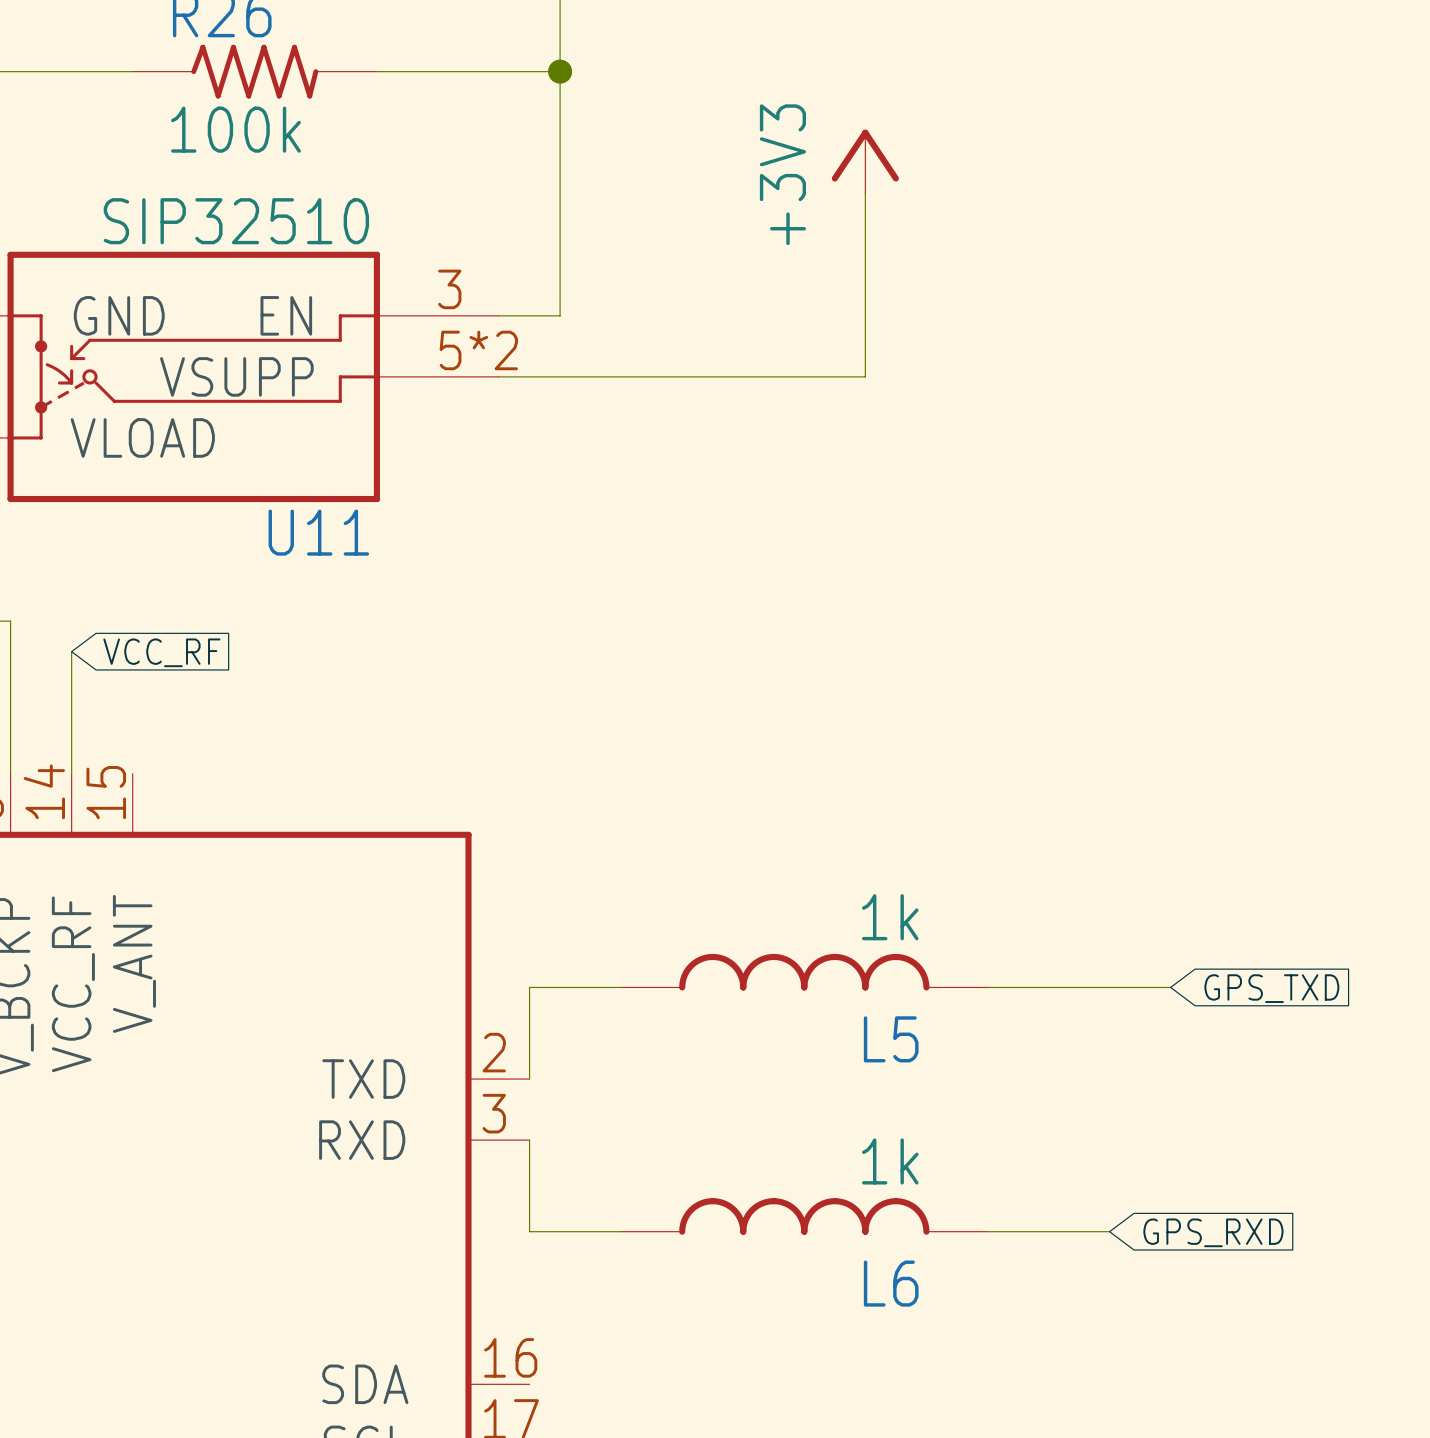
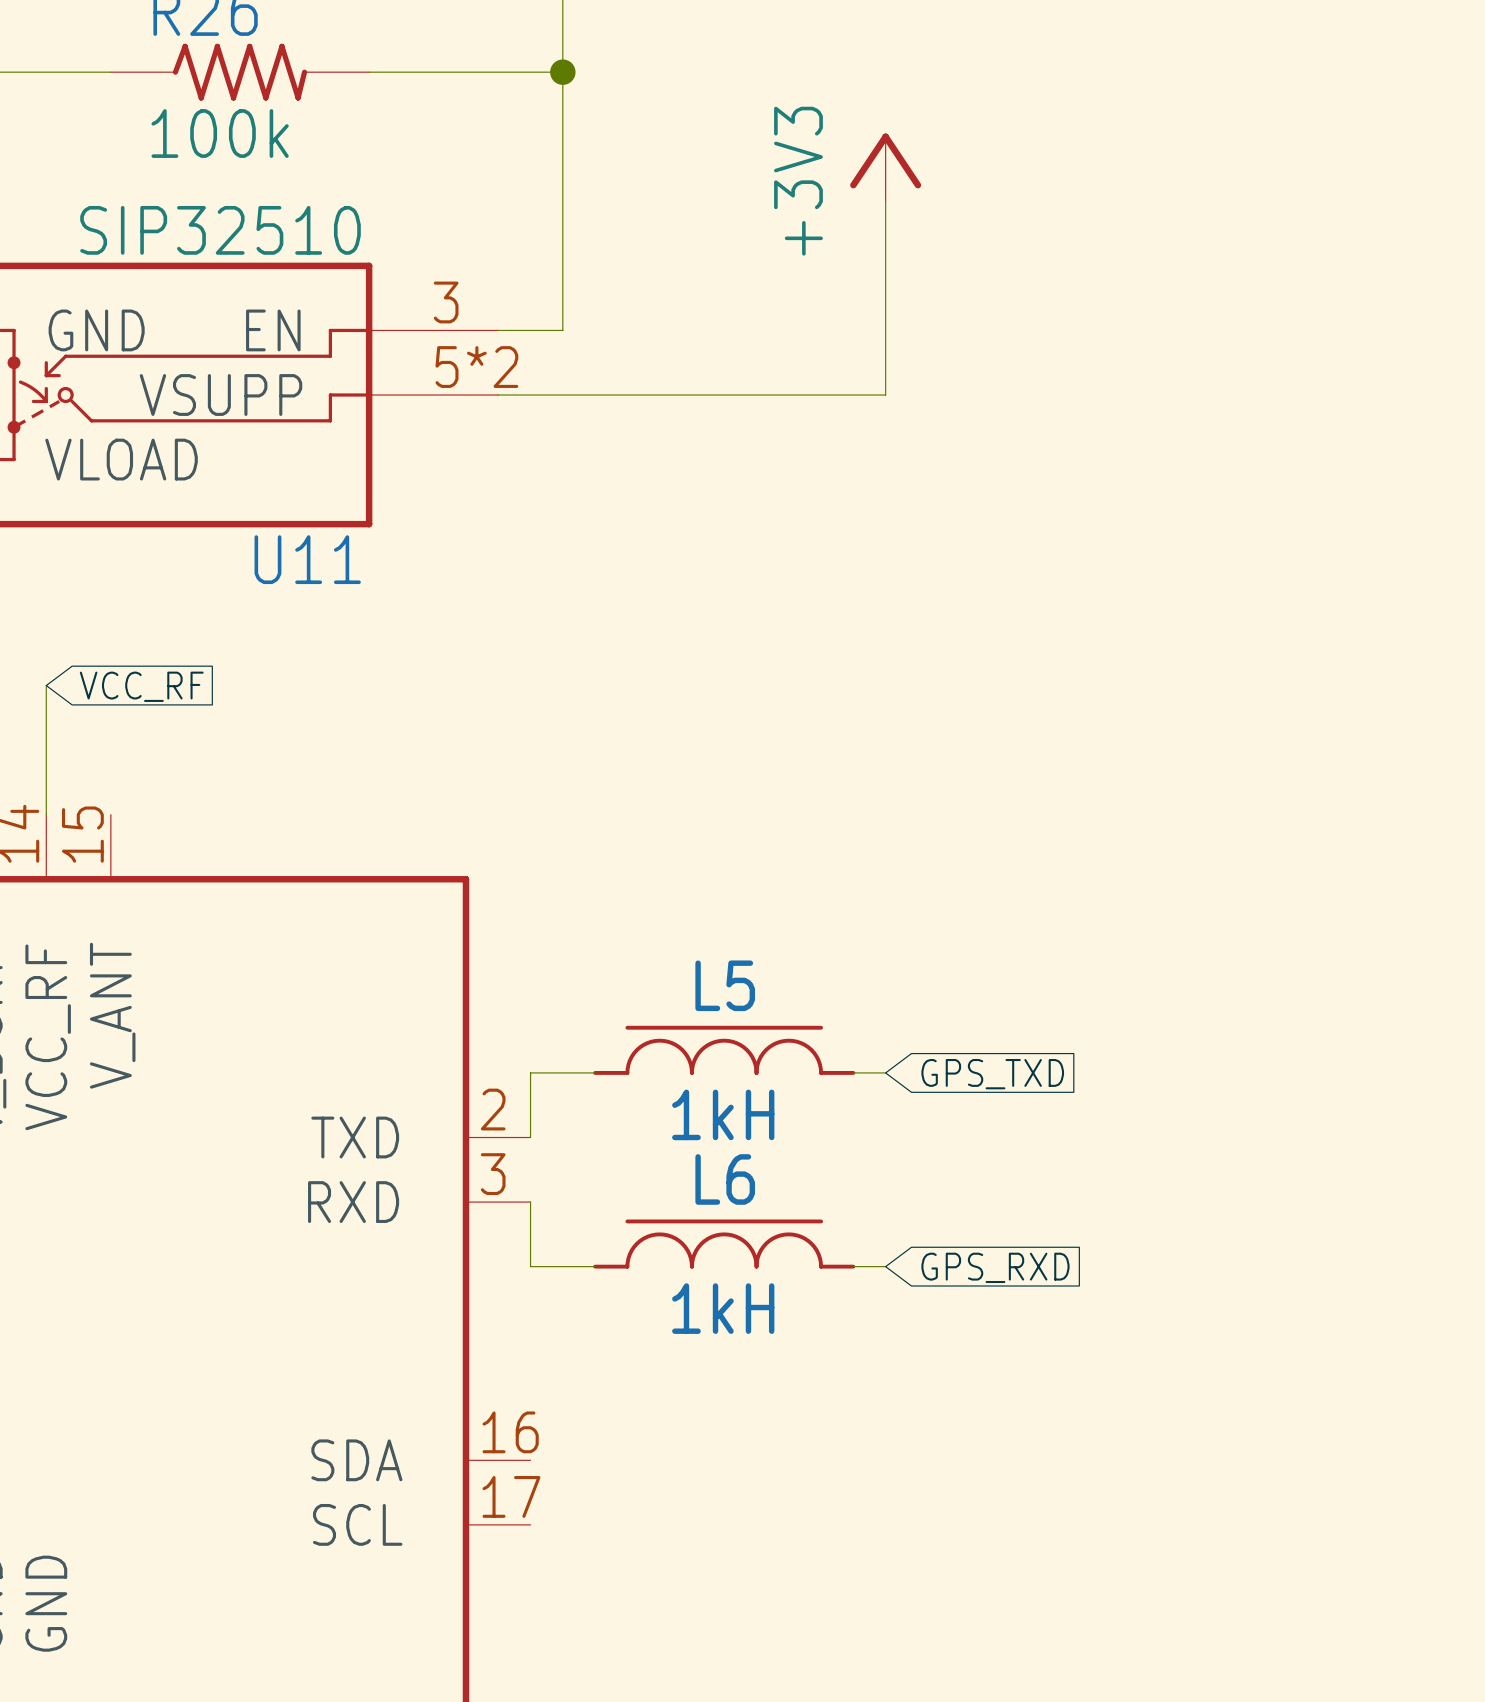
L5 value: 1k (890, 917) -> 1kH (723, 1114)
L5 symbol: [621, 953, 988, 991] -> [593, 1025, 856, 1075]
wire: (621, 987) (529, 987) (529, 1017) -> (595, 1072) (530, 1072)
wire: (987, 987) (1170, 987) -> none
global label position: GPS_TXD (1271, 988) -> GPS_TXD (992, 1074)
wire: none -> (853, 1072) (885, 1072)
L5 name position: L5 (891, 1039) -> L5 (725, 985)
L6 value: 1k (890, 1161) -> 1kH (723, 1308)
L6 symbol: [621, 1198, 988, 1235] -> [593, 1219, 856, 1269]
wire: (529, 1201) (529, 1231) (621, 1231) -> (530, 1266) (595, 1266)
wire: none -> (853, 1266) (885, 1266)
wire: (987, 1231) (1109, 1231) -> none
global label position: GPS_RXD (1213, 1232) -> GPS_RXD (995, 1267)
L6 name position: L6 (891, 1283) -> L6 (725, 1179)

